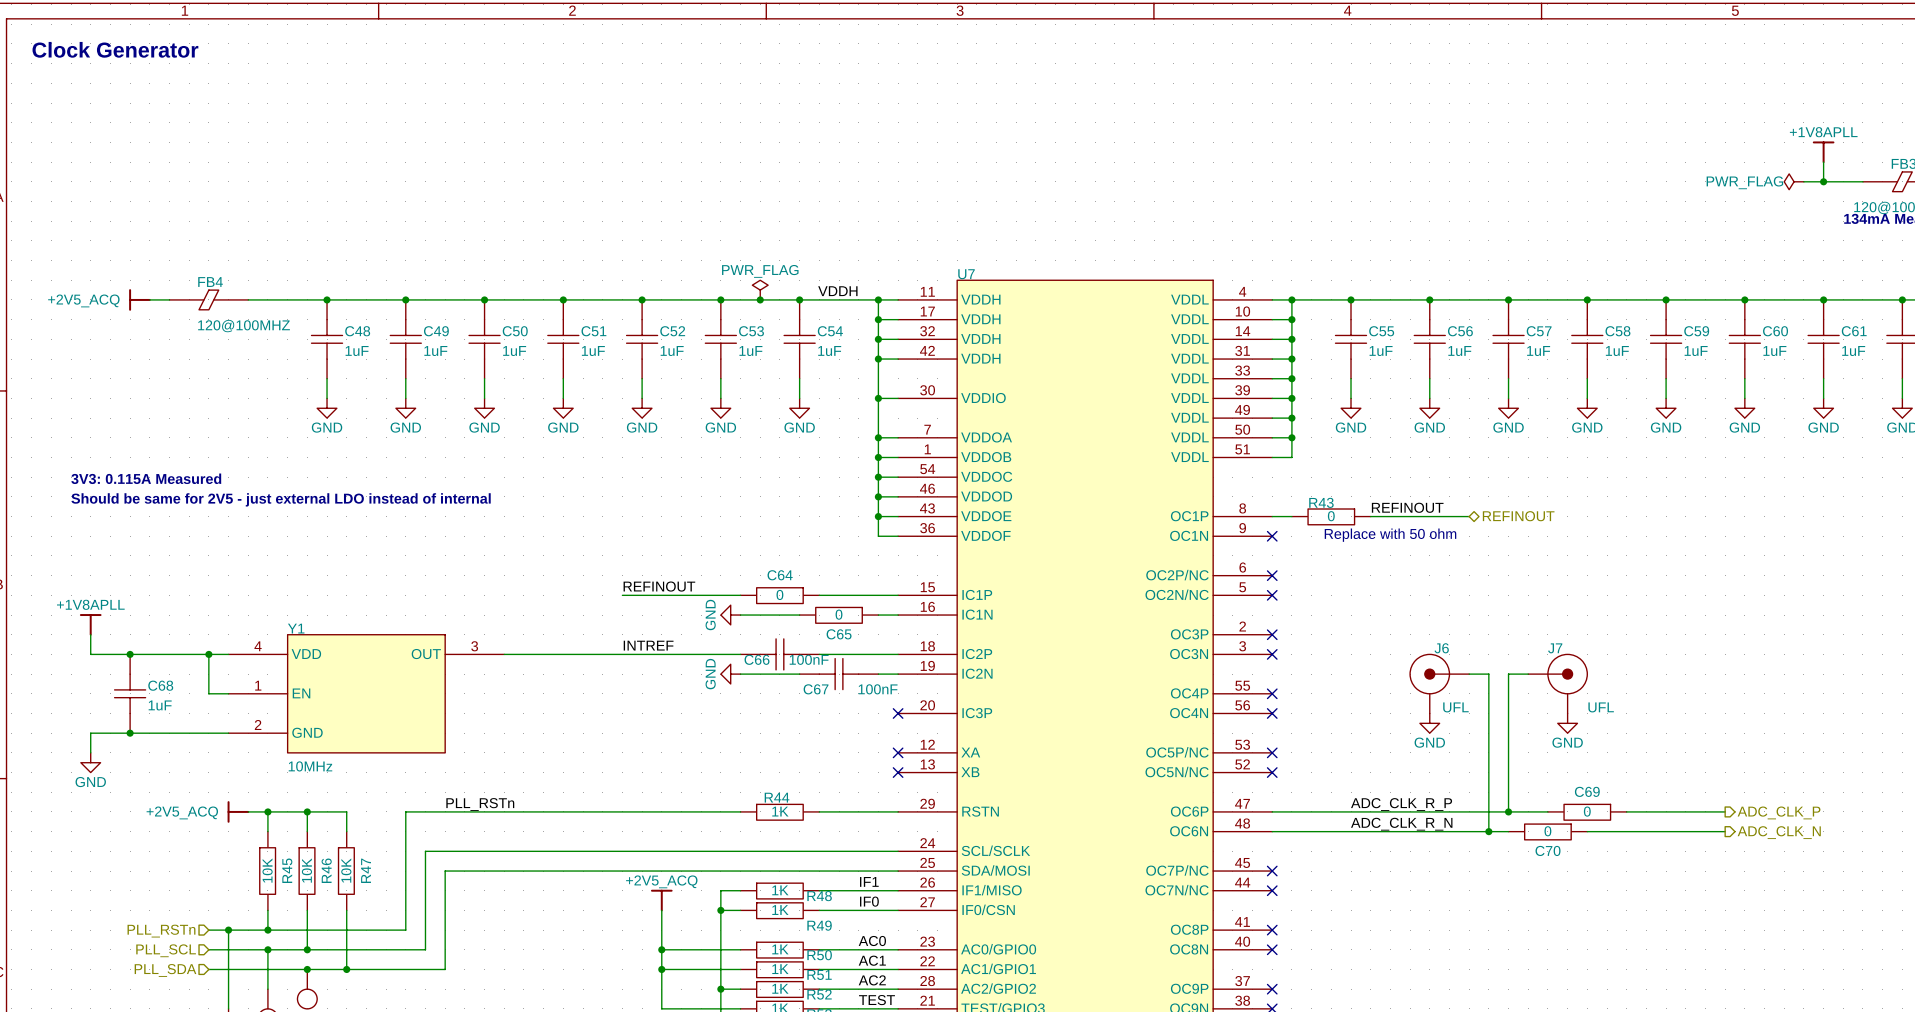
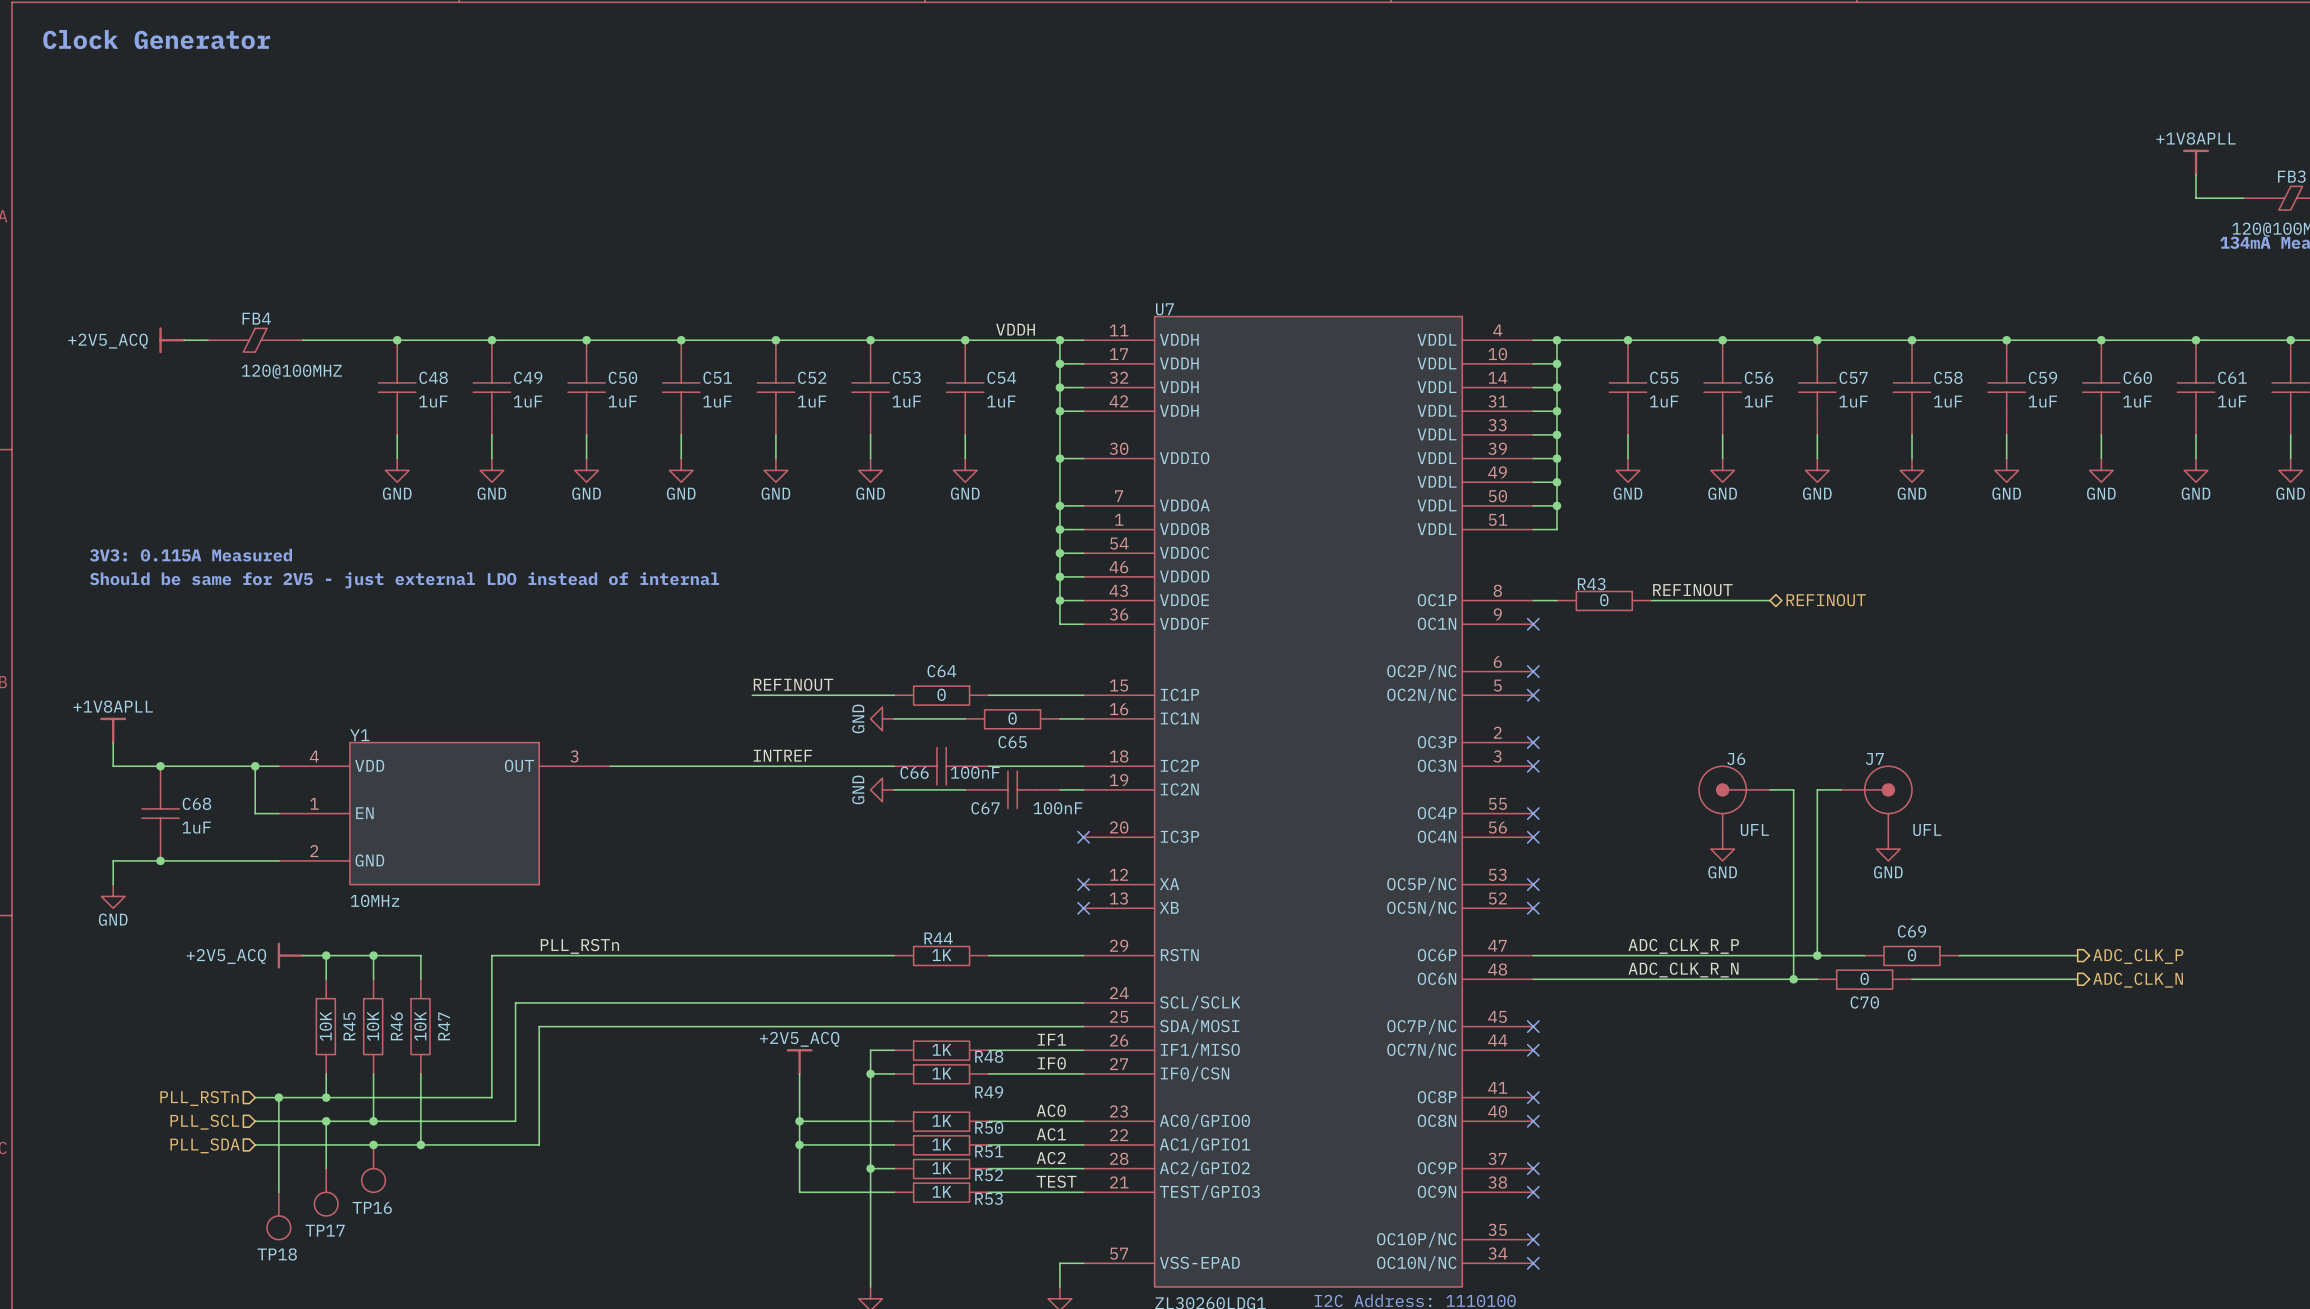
power symbol: PWR_FLAG (1794, 181) -> none
wire: (1803, 181) (1823, 181) -> none
junction: (1823, 181) -> none
power symbol: PWR_FLAG (760, 290) -> none
junction: (760, 299) -> none
text: Replace with 50 ohm (1390, 535) -> none

